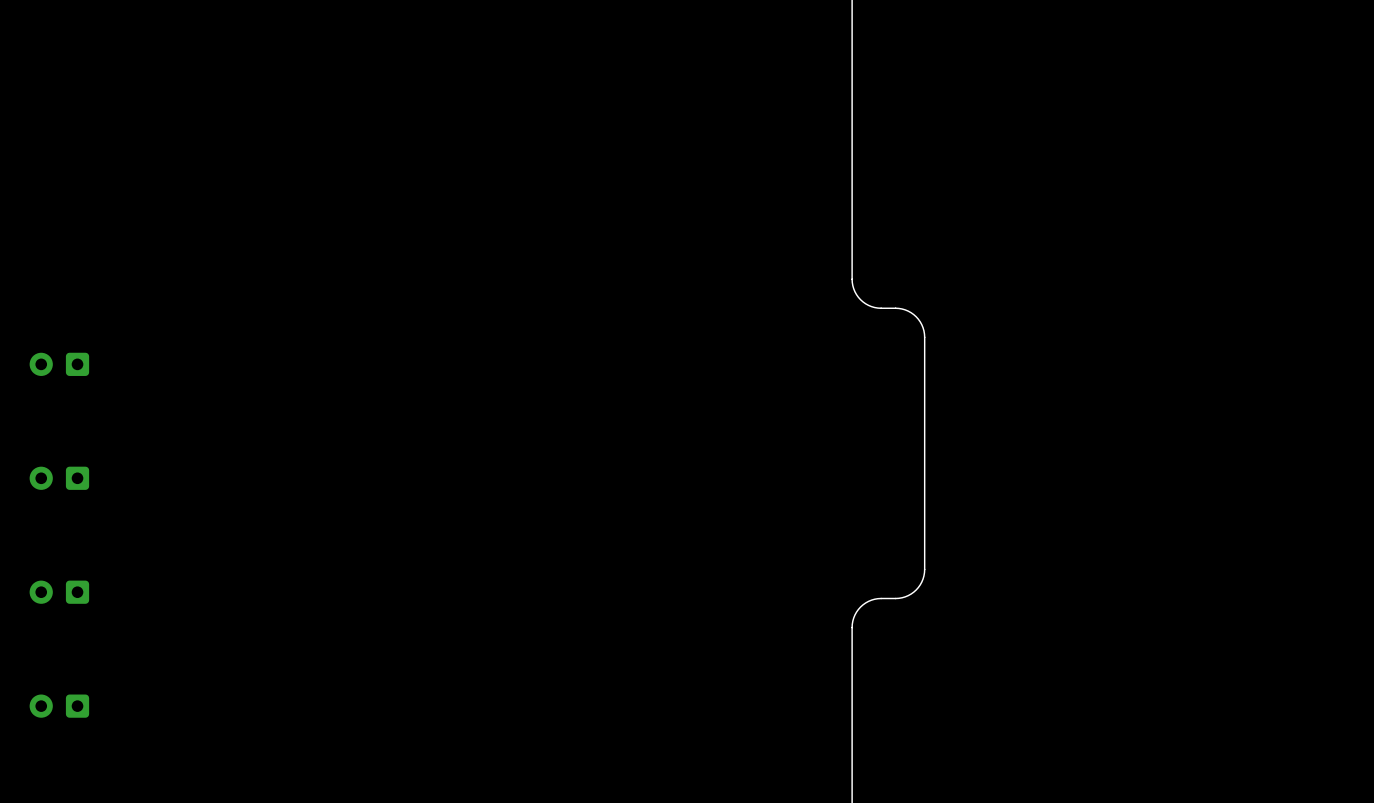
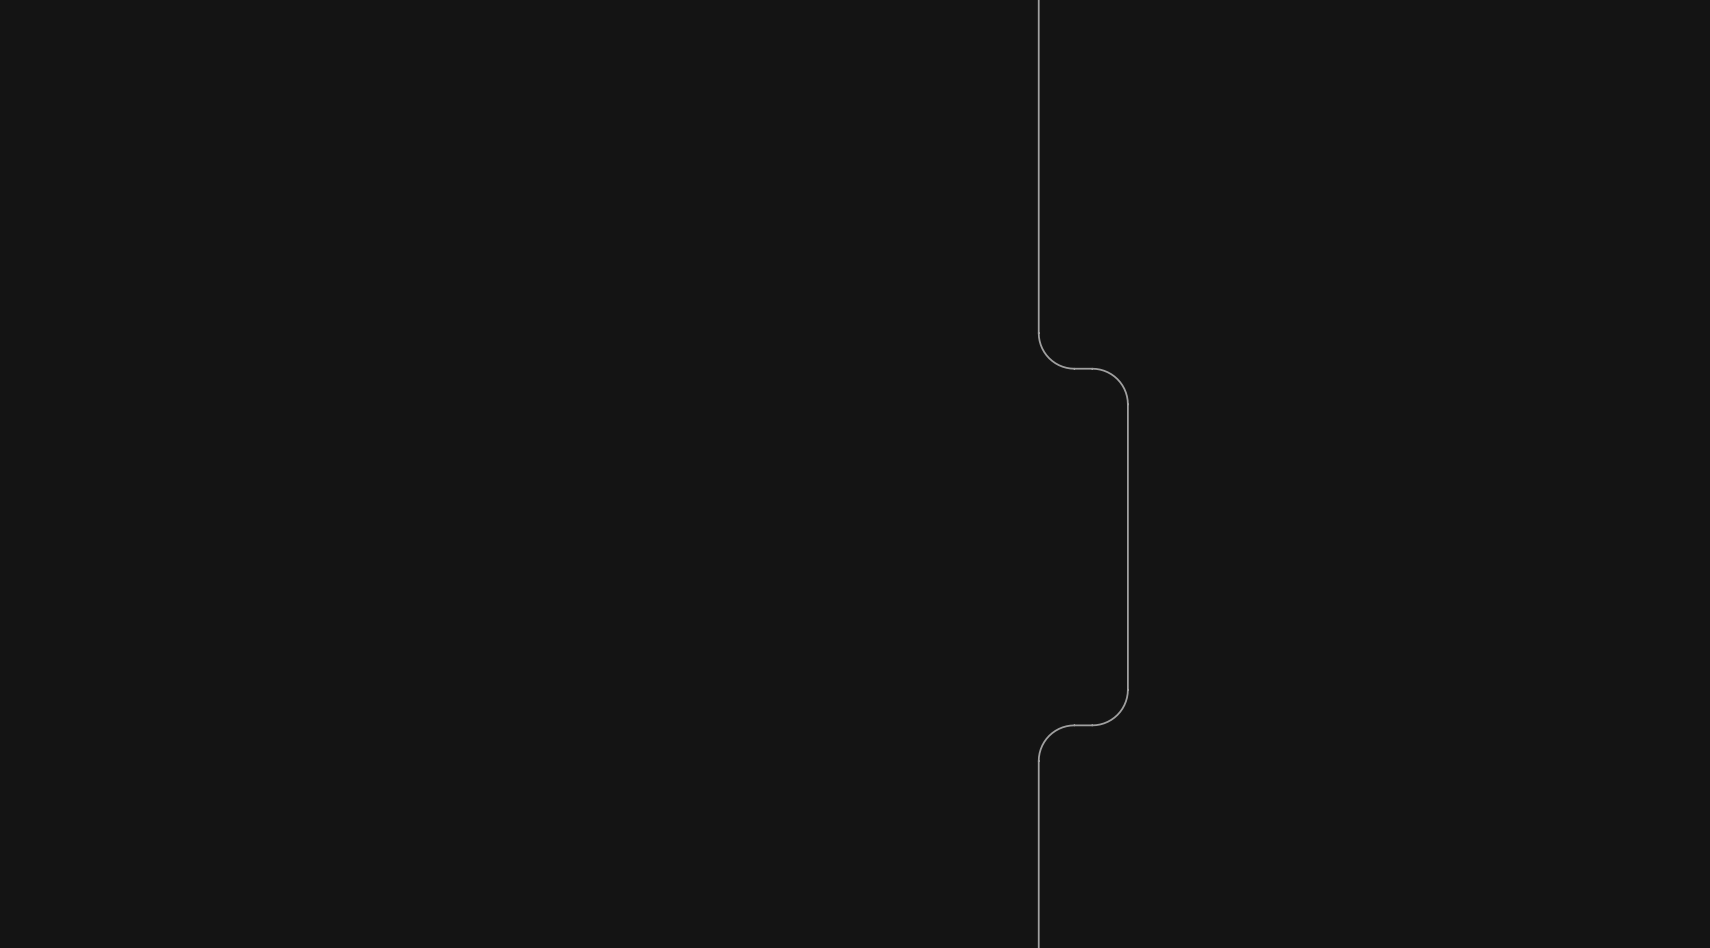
part: (59, 364) -> none
part: (59, 478) -> none
part: (59, 592) -> none
part: (59, 706) -> none

